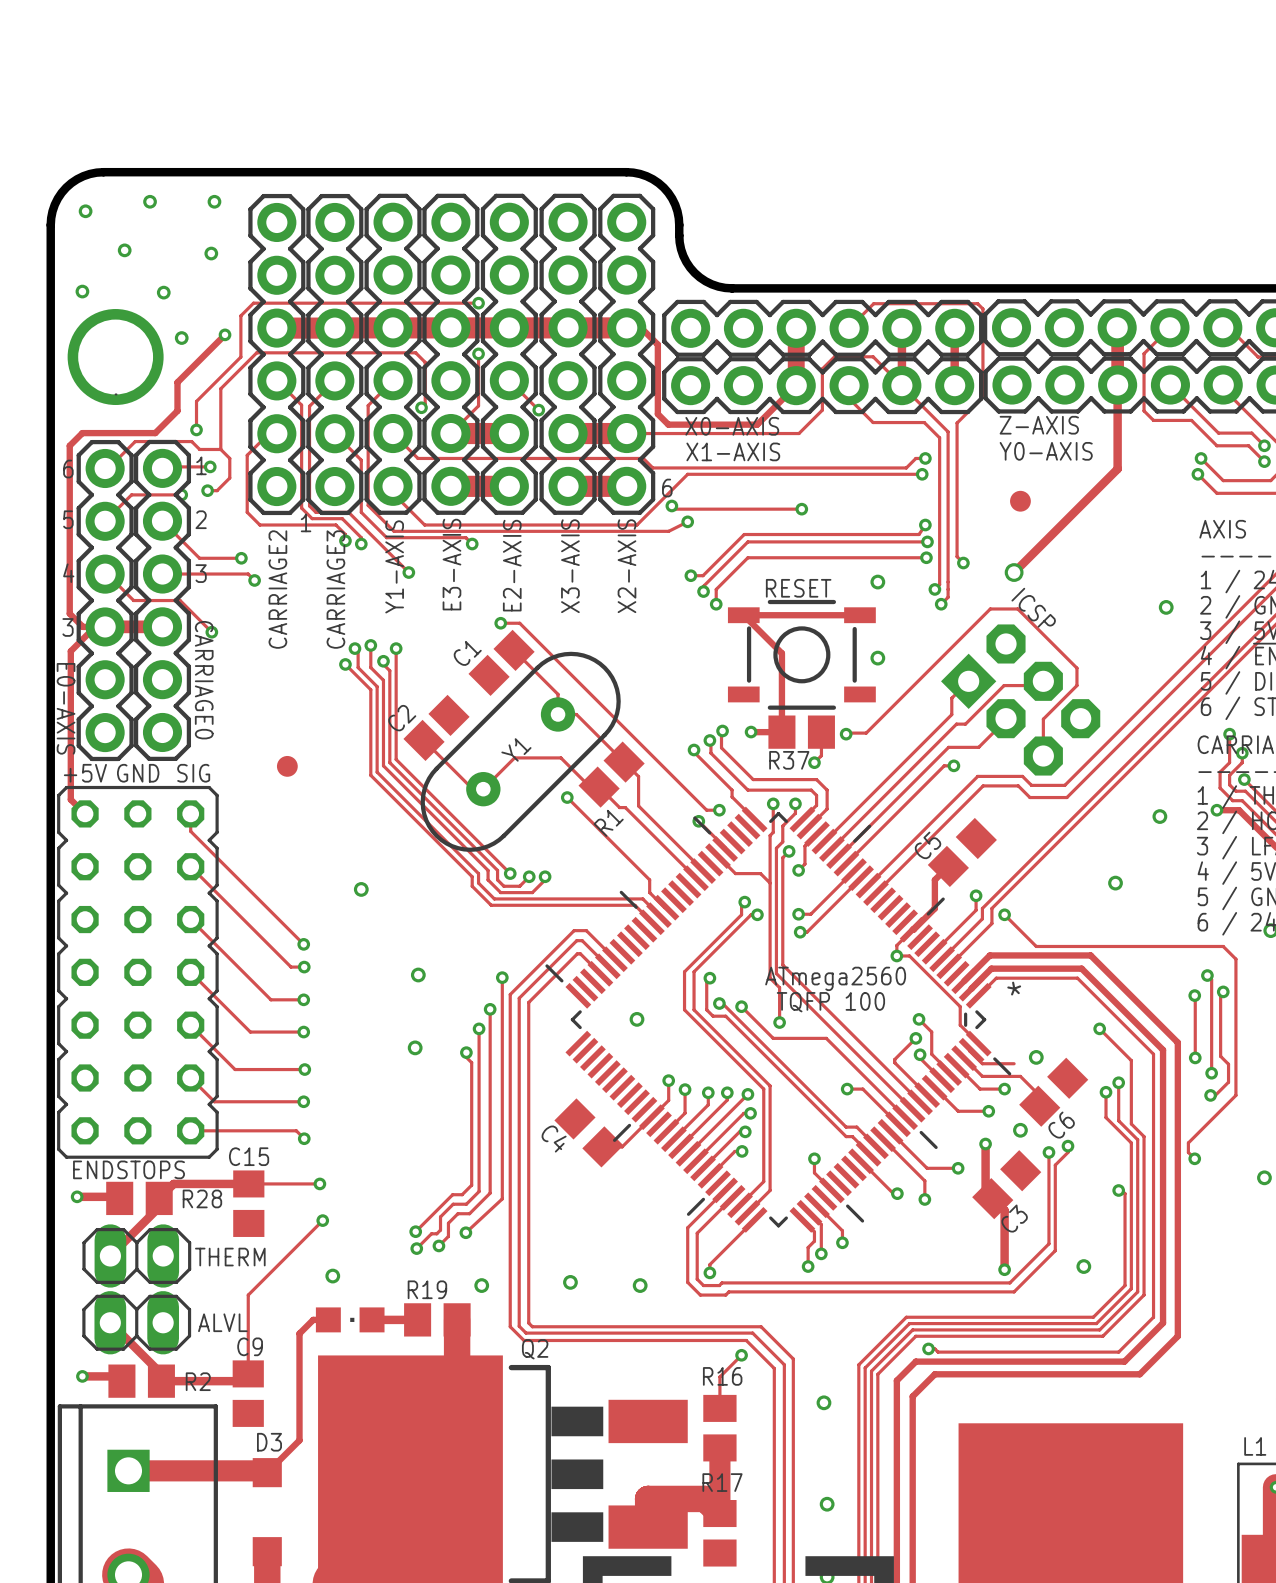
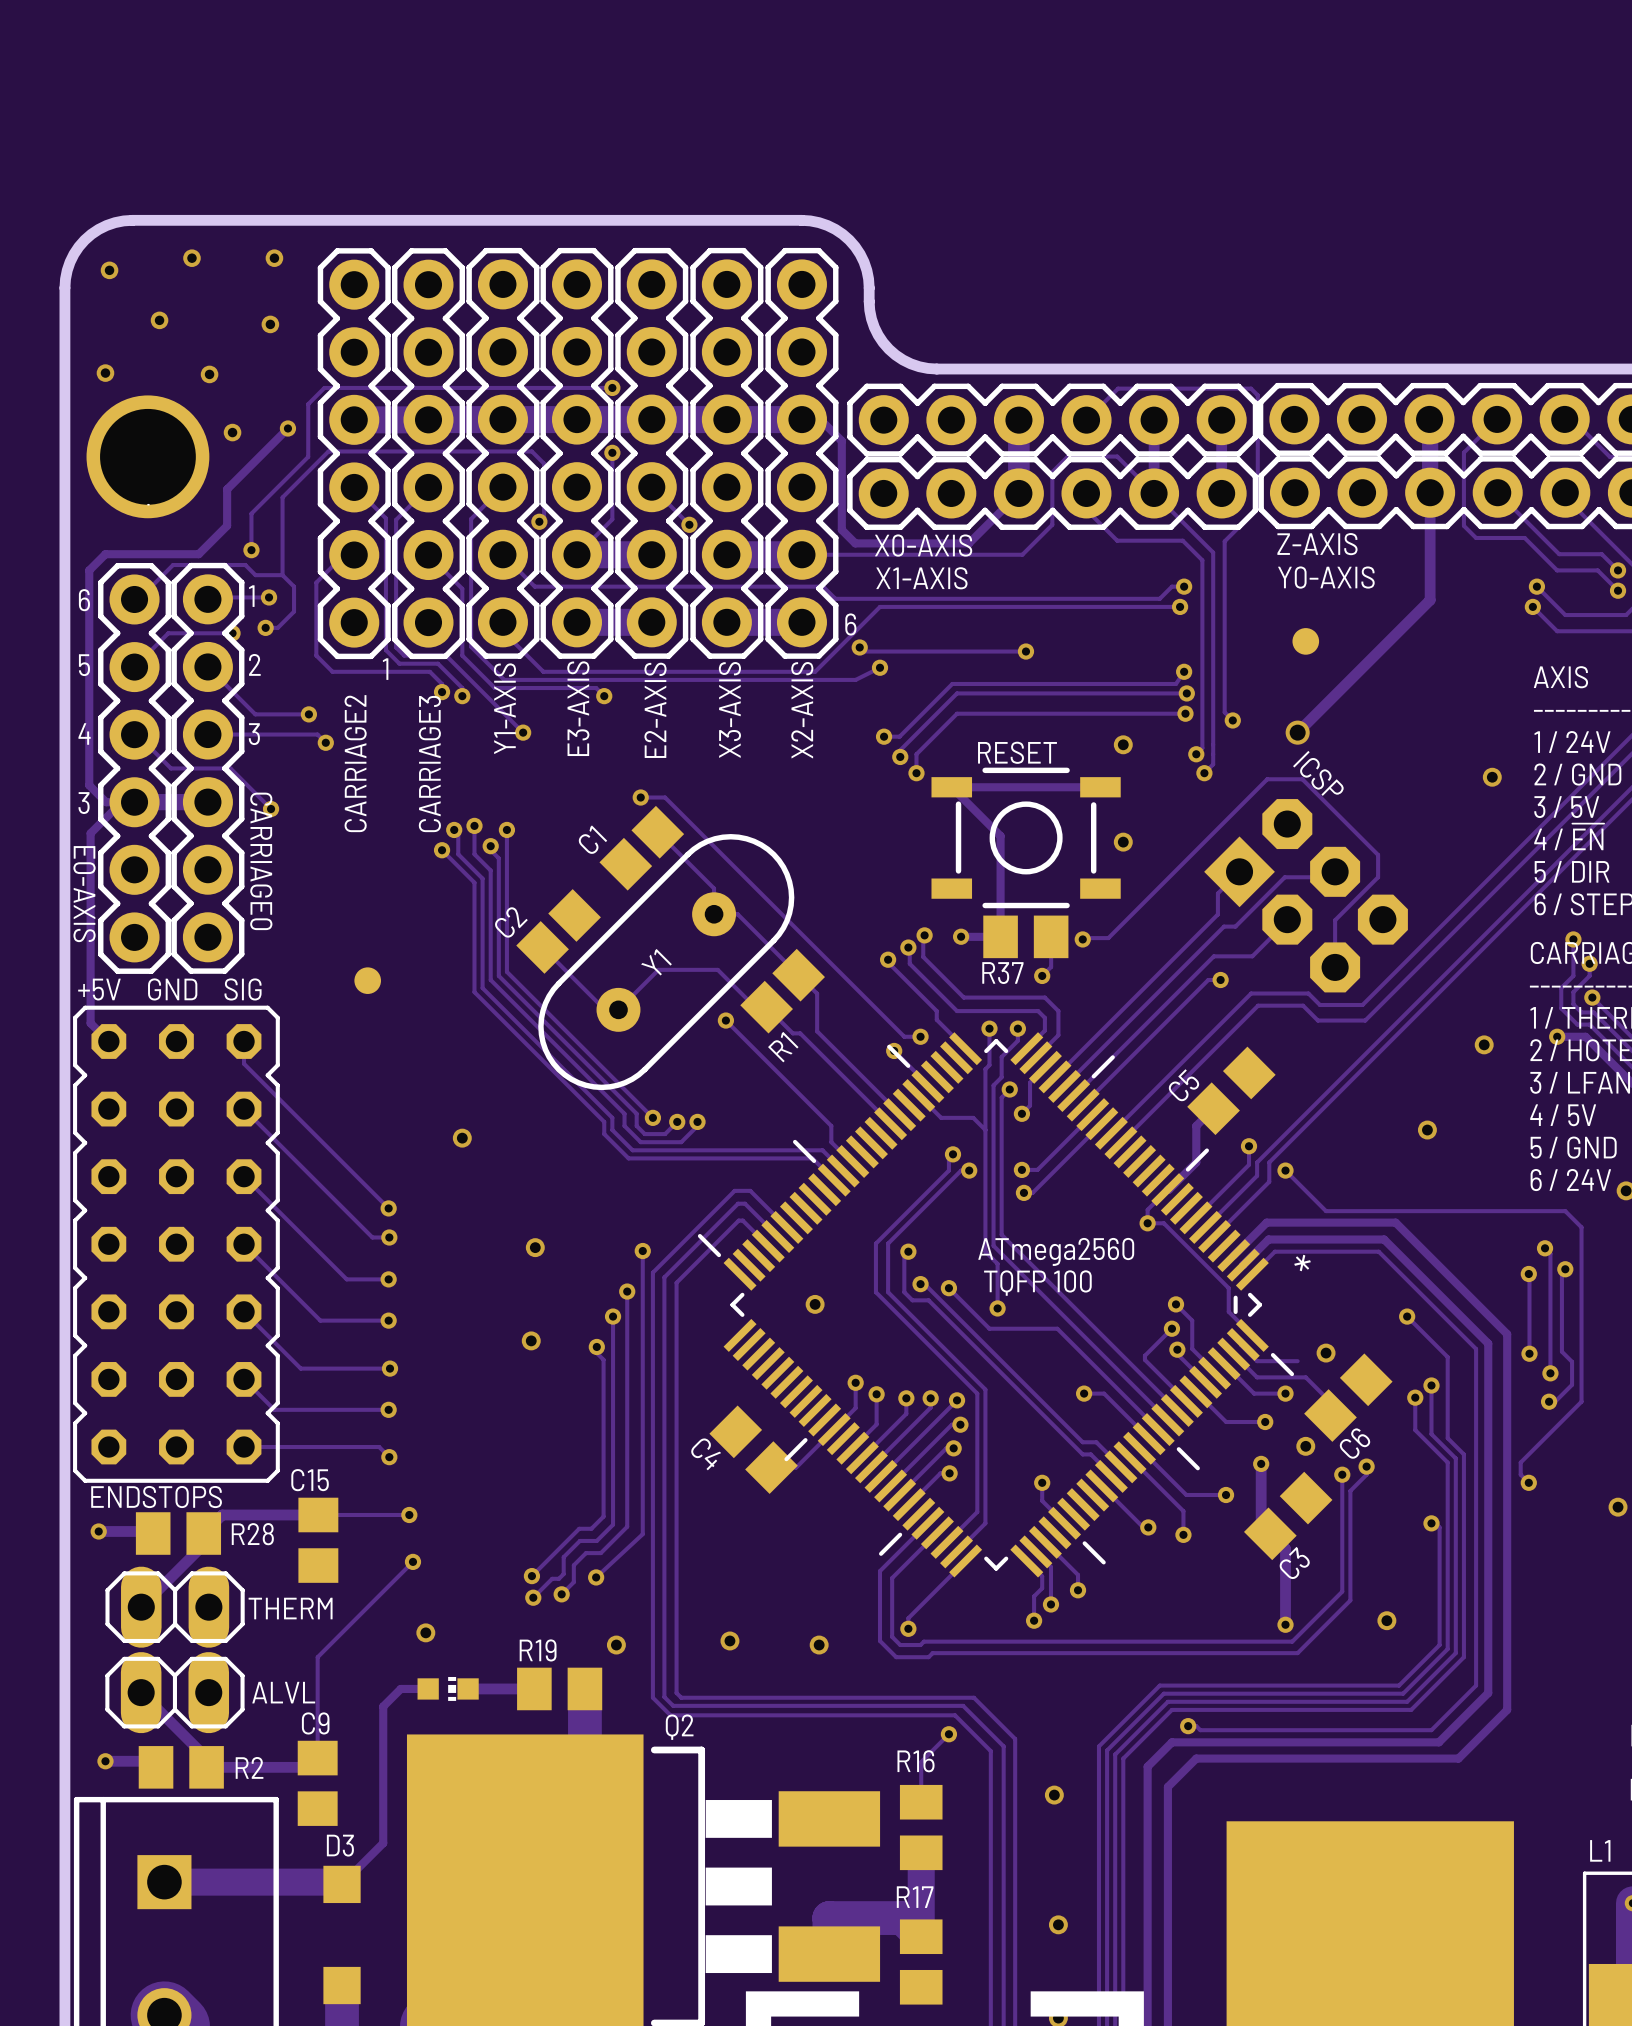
part footprint: [315, 1307, 385, 1333] -> [417, 1676, 479, 1701]

